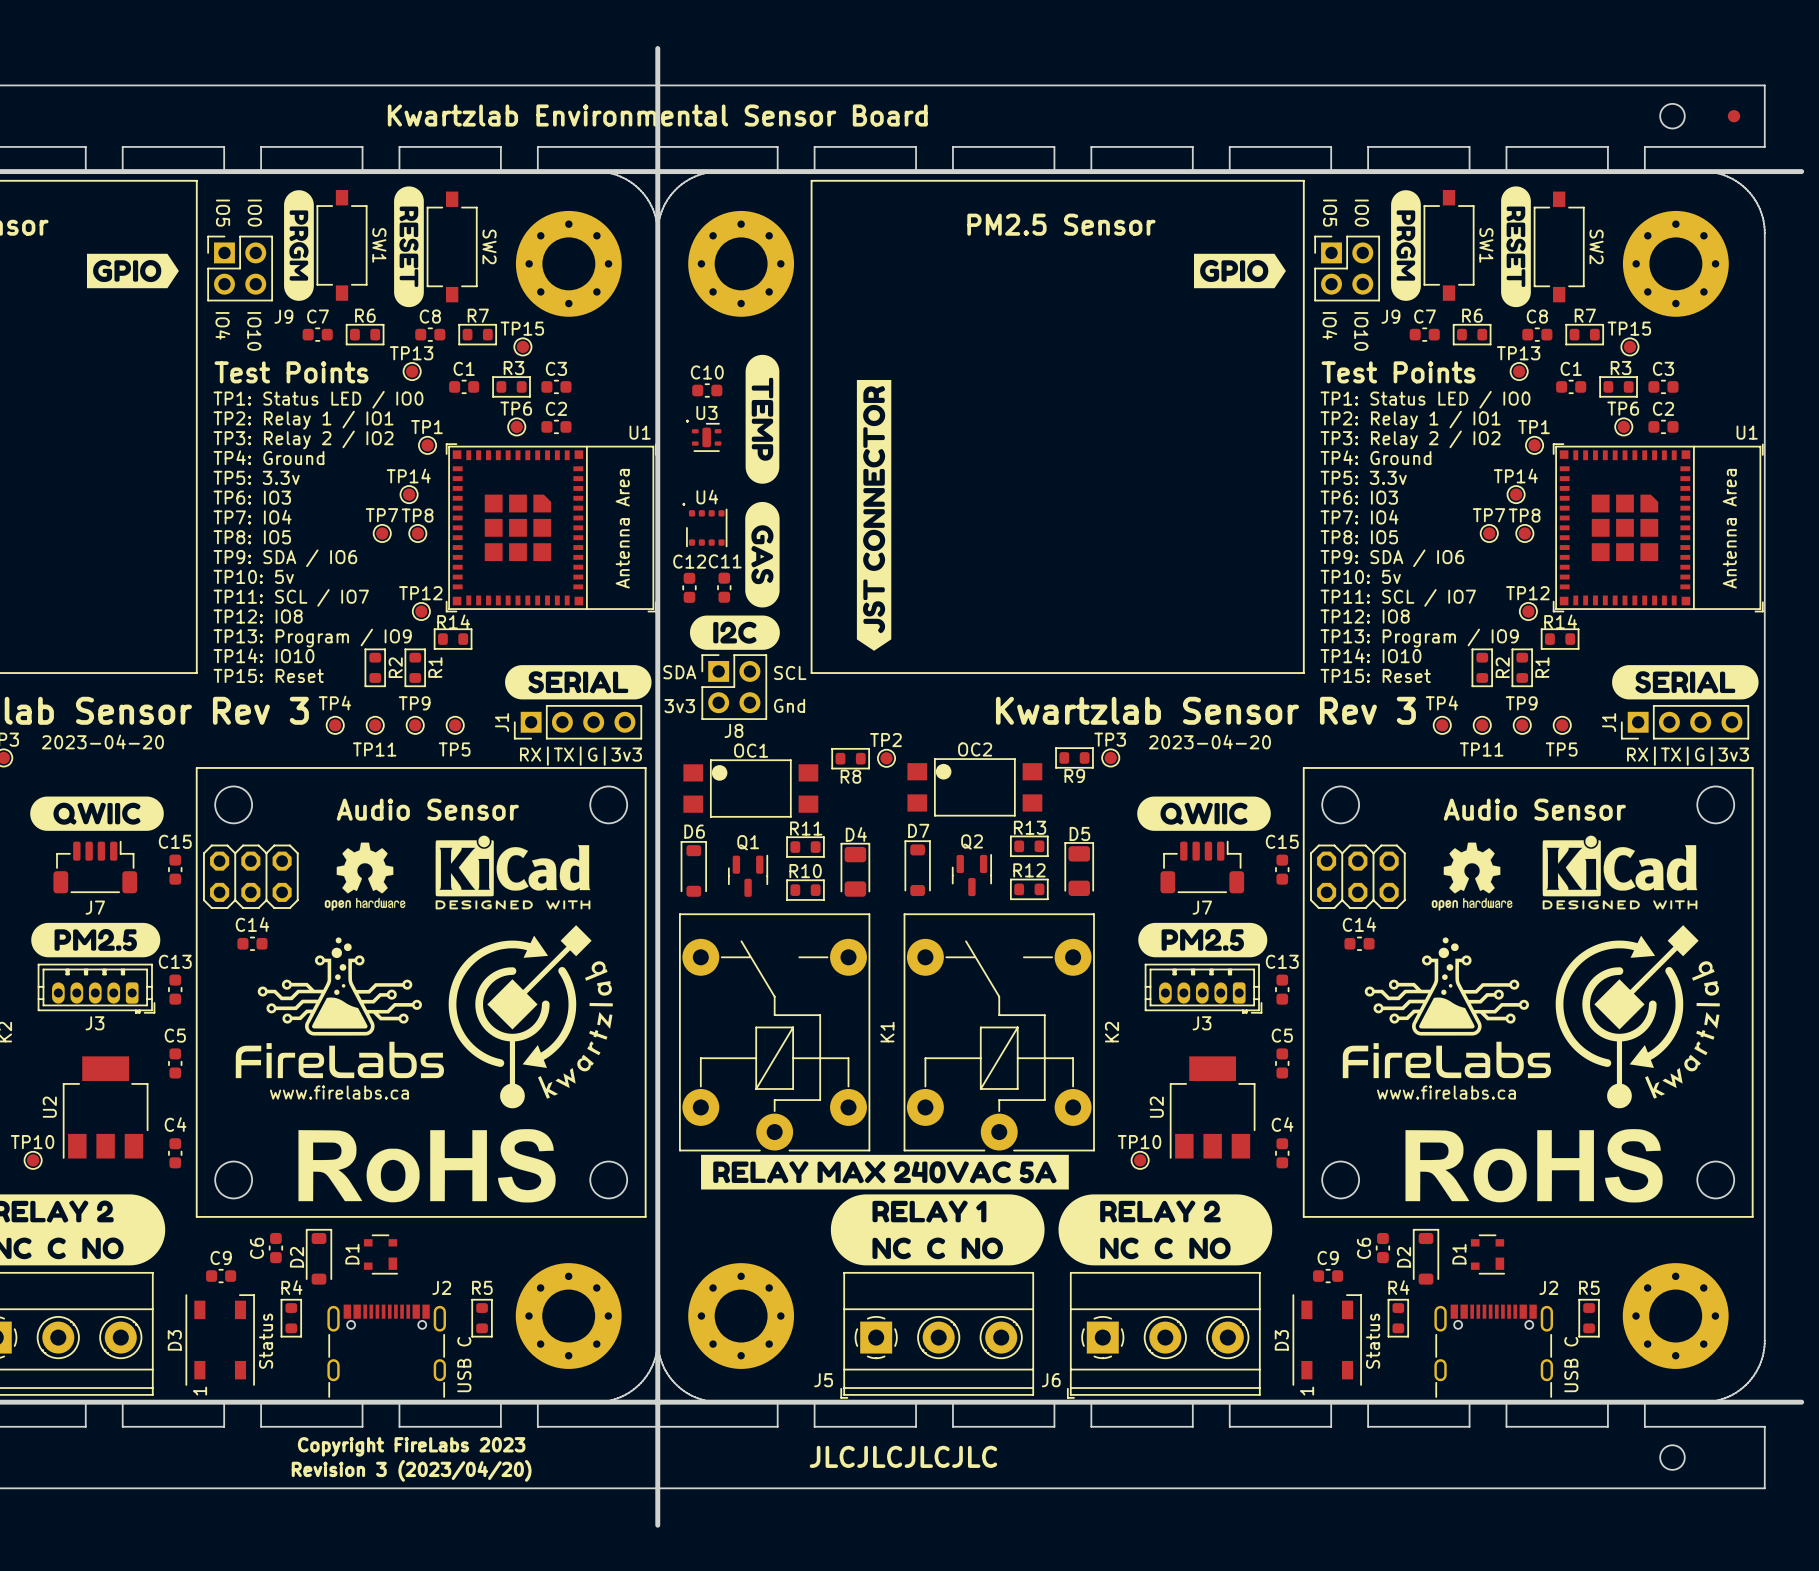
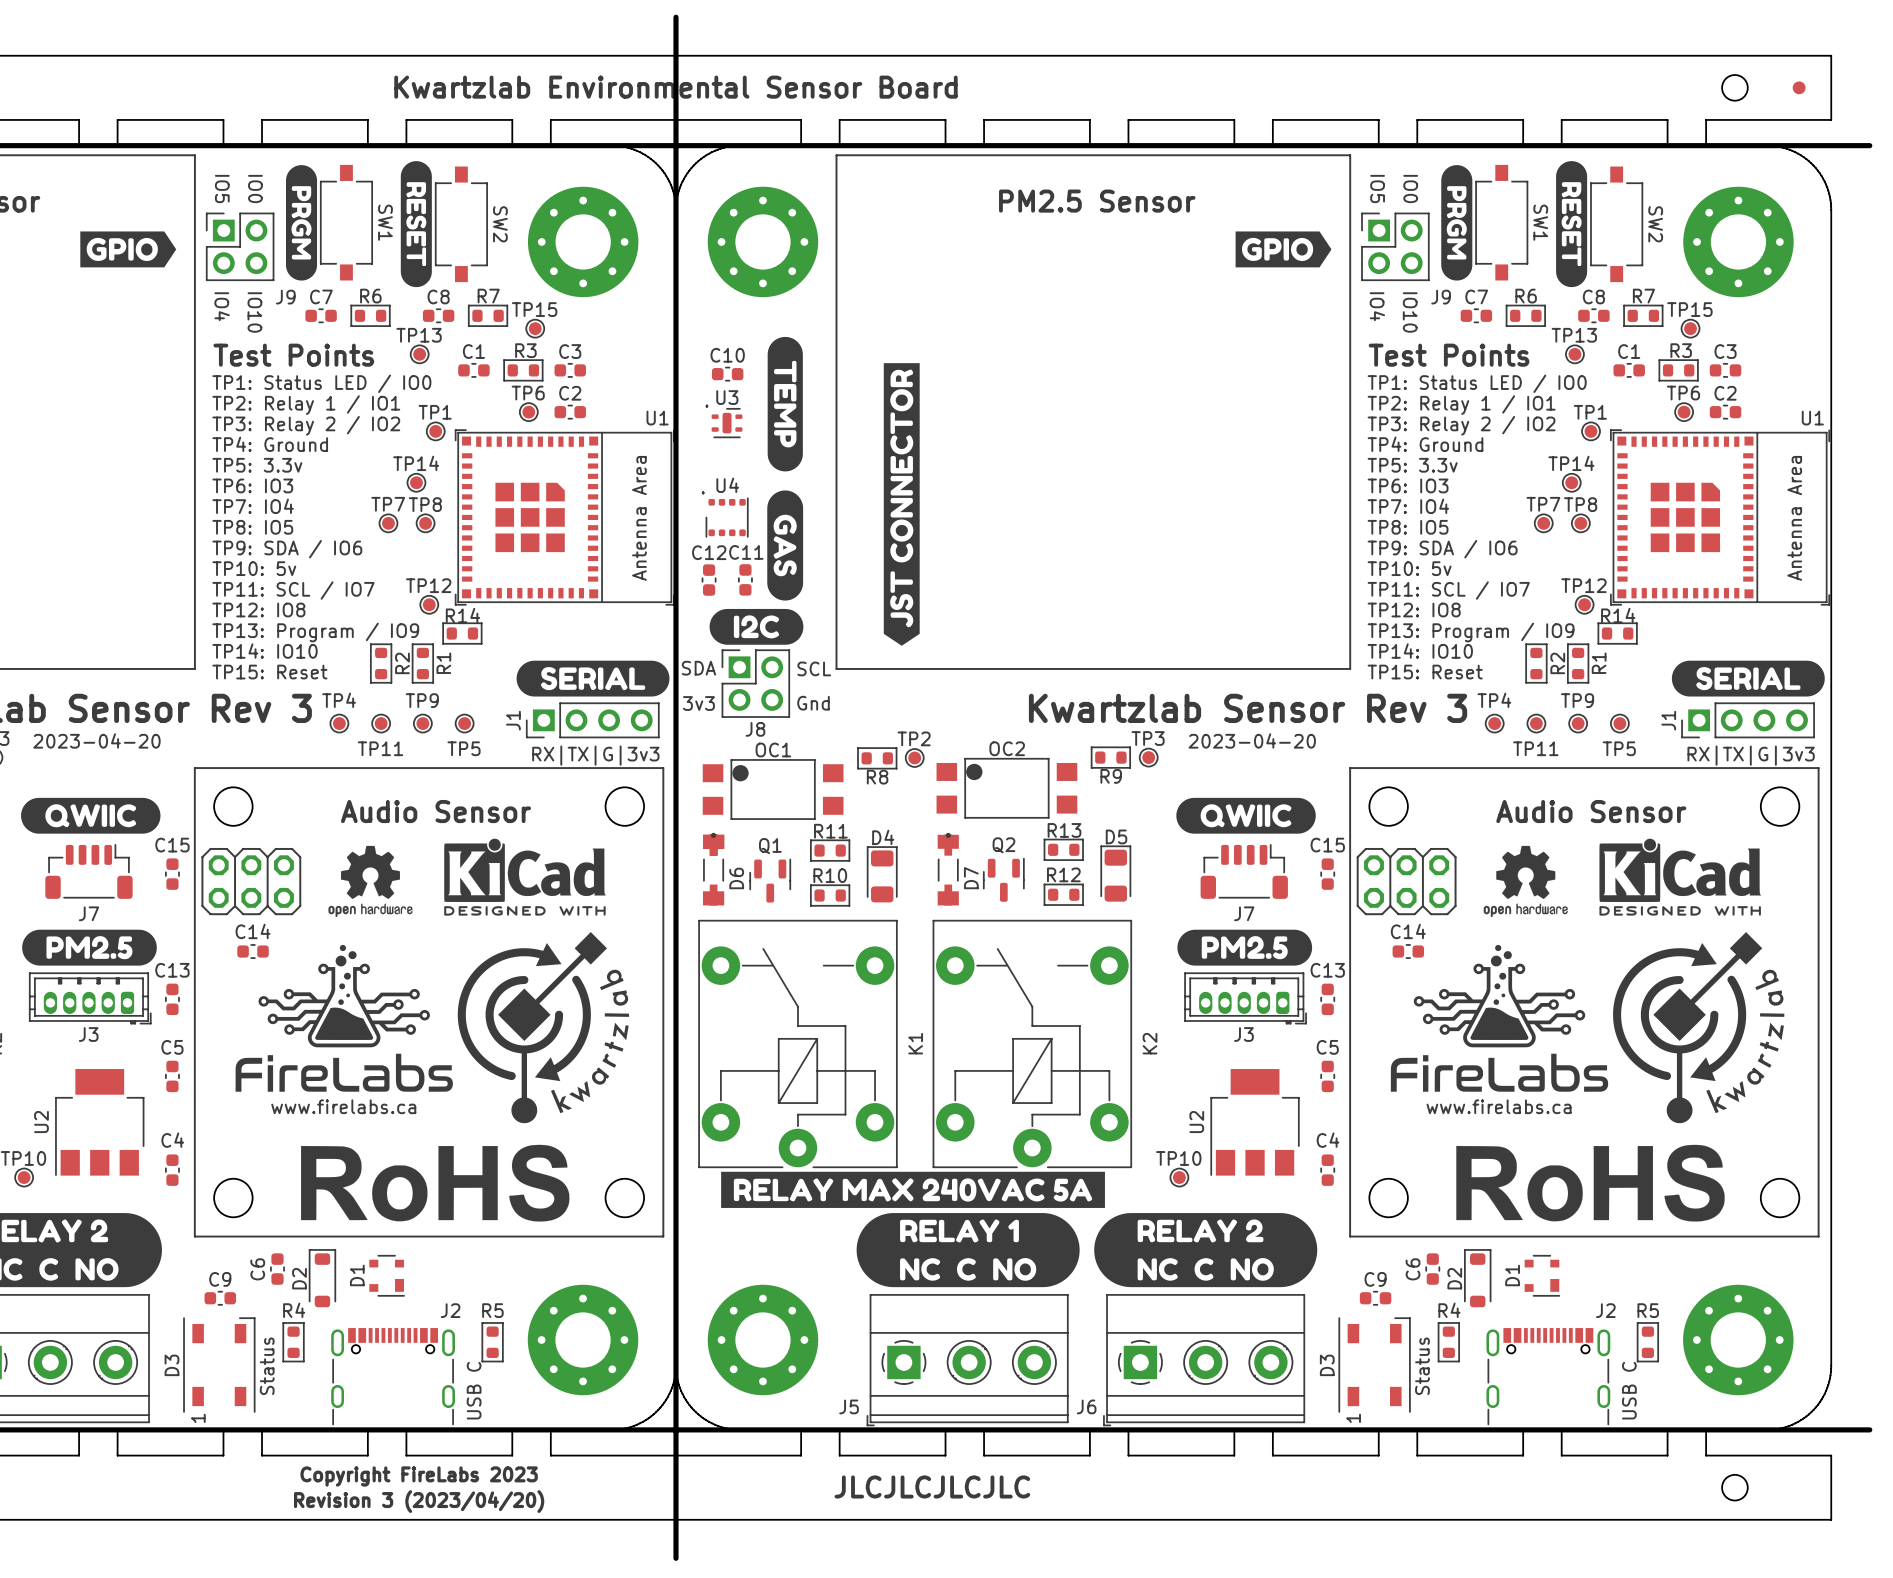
D7 name position: D7 (918, 830) -> D7 (971, 878)
D6 name position: D6 (694, 831) -> D6 (736, 878)
D7 footprint: [904, 840, 931, 897] -> [937, 832, 959, 906]
D6 footprint: [680, 841, 707, 897] -> [702, 832, 725, 906]
part: none -> (713, 845)

